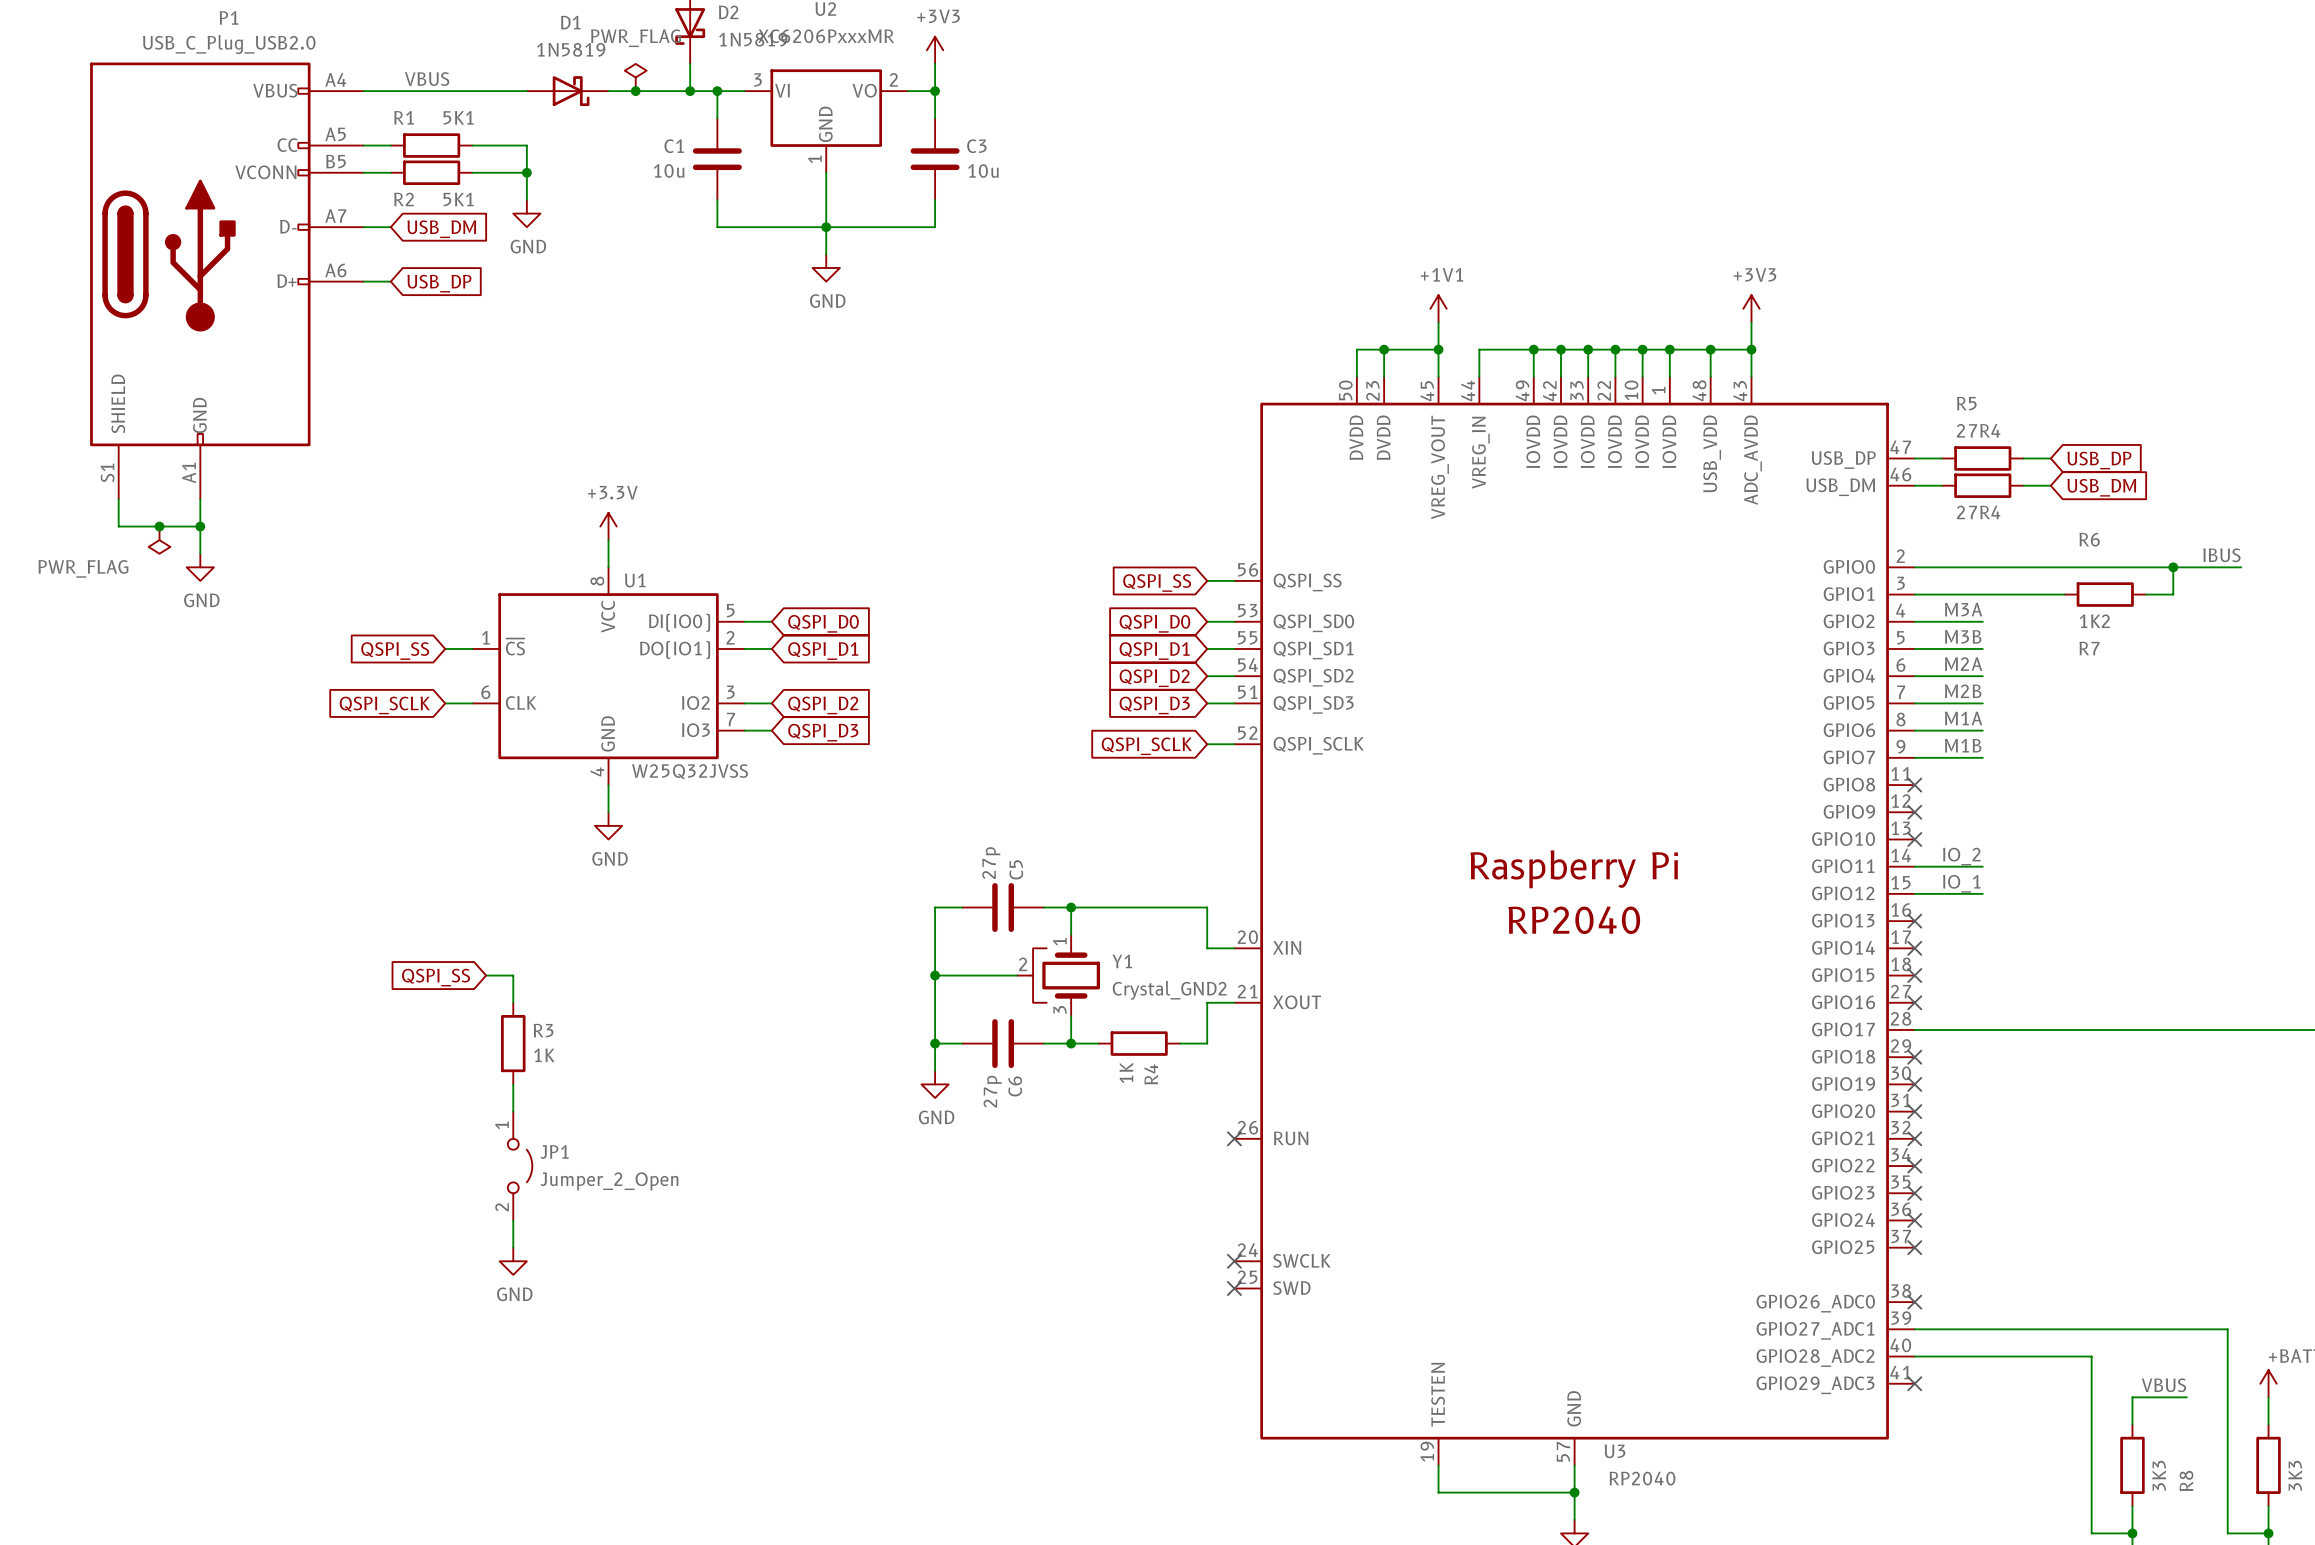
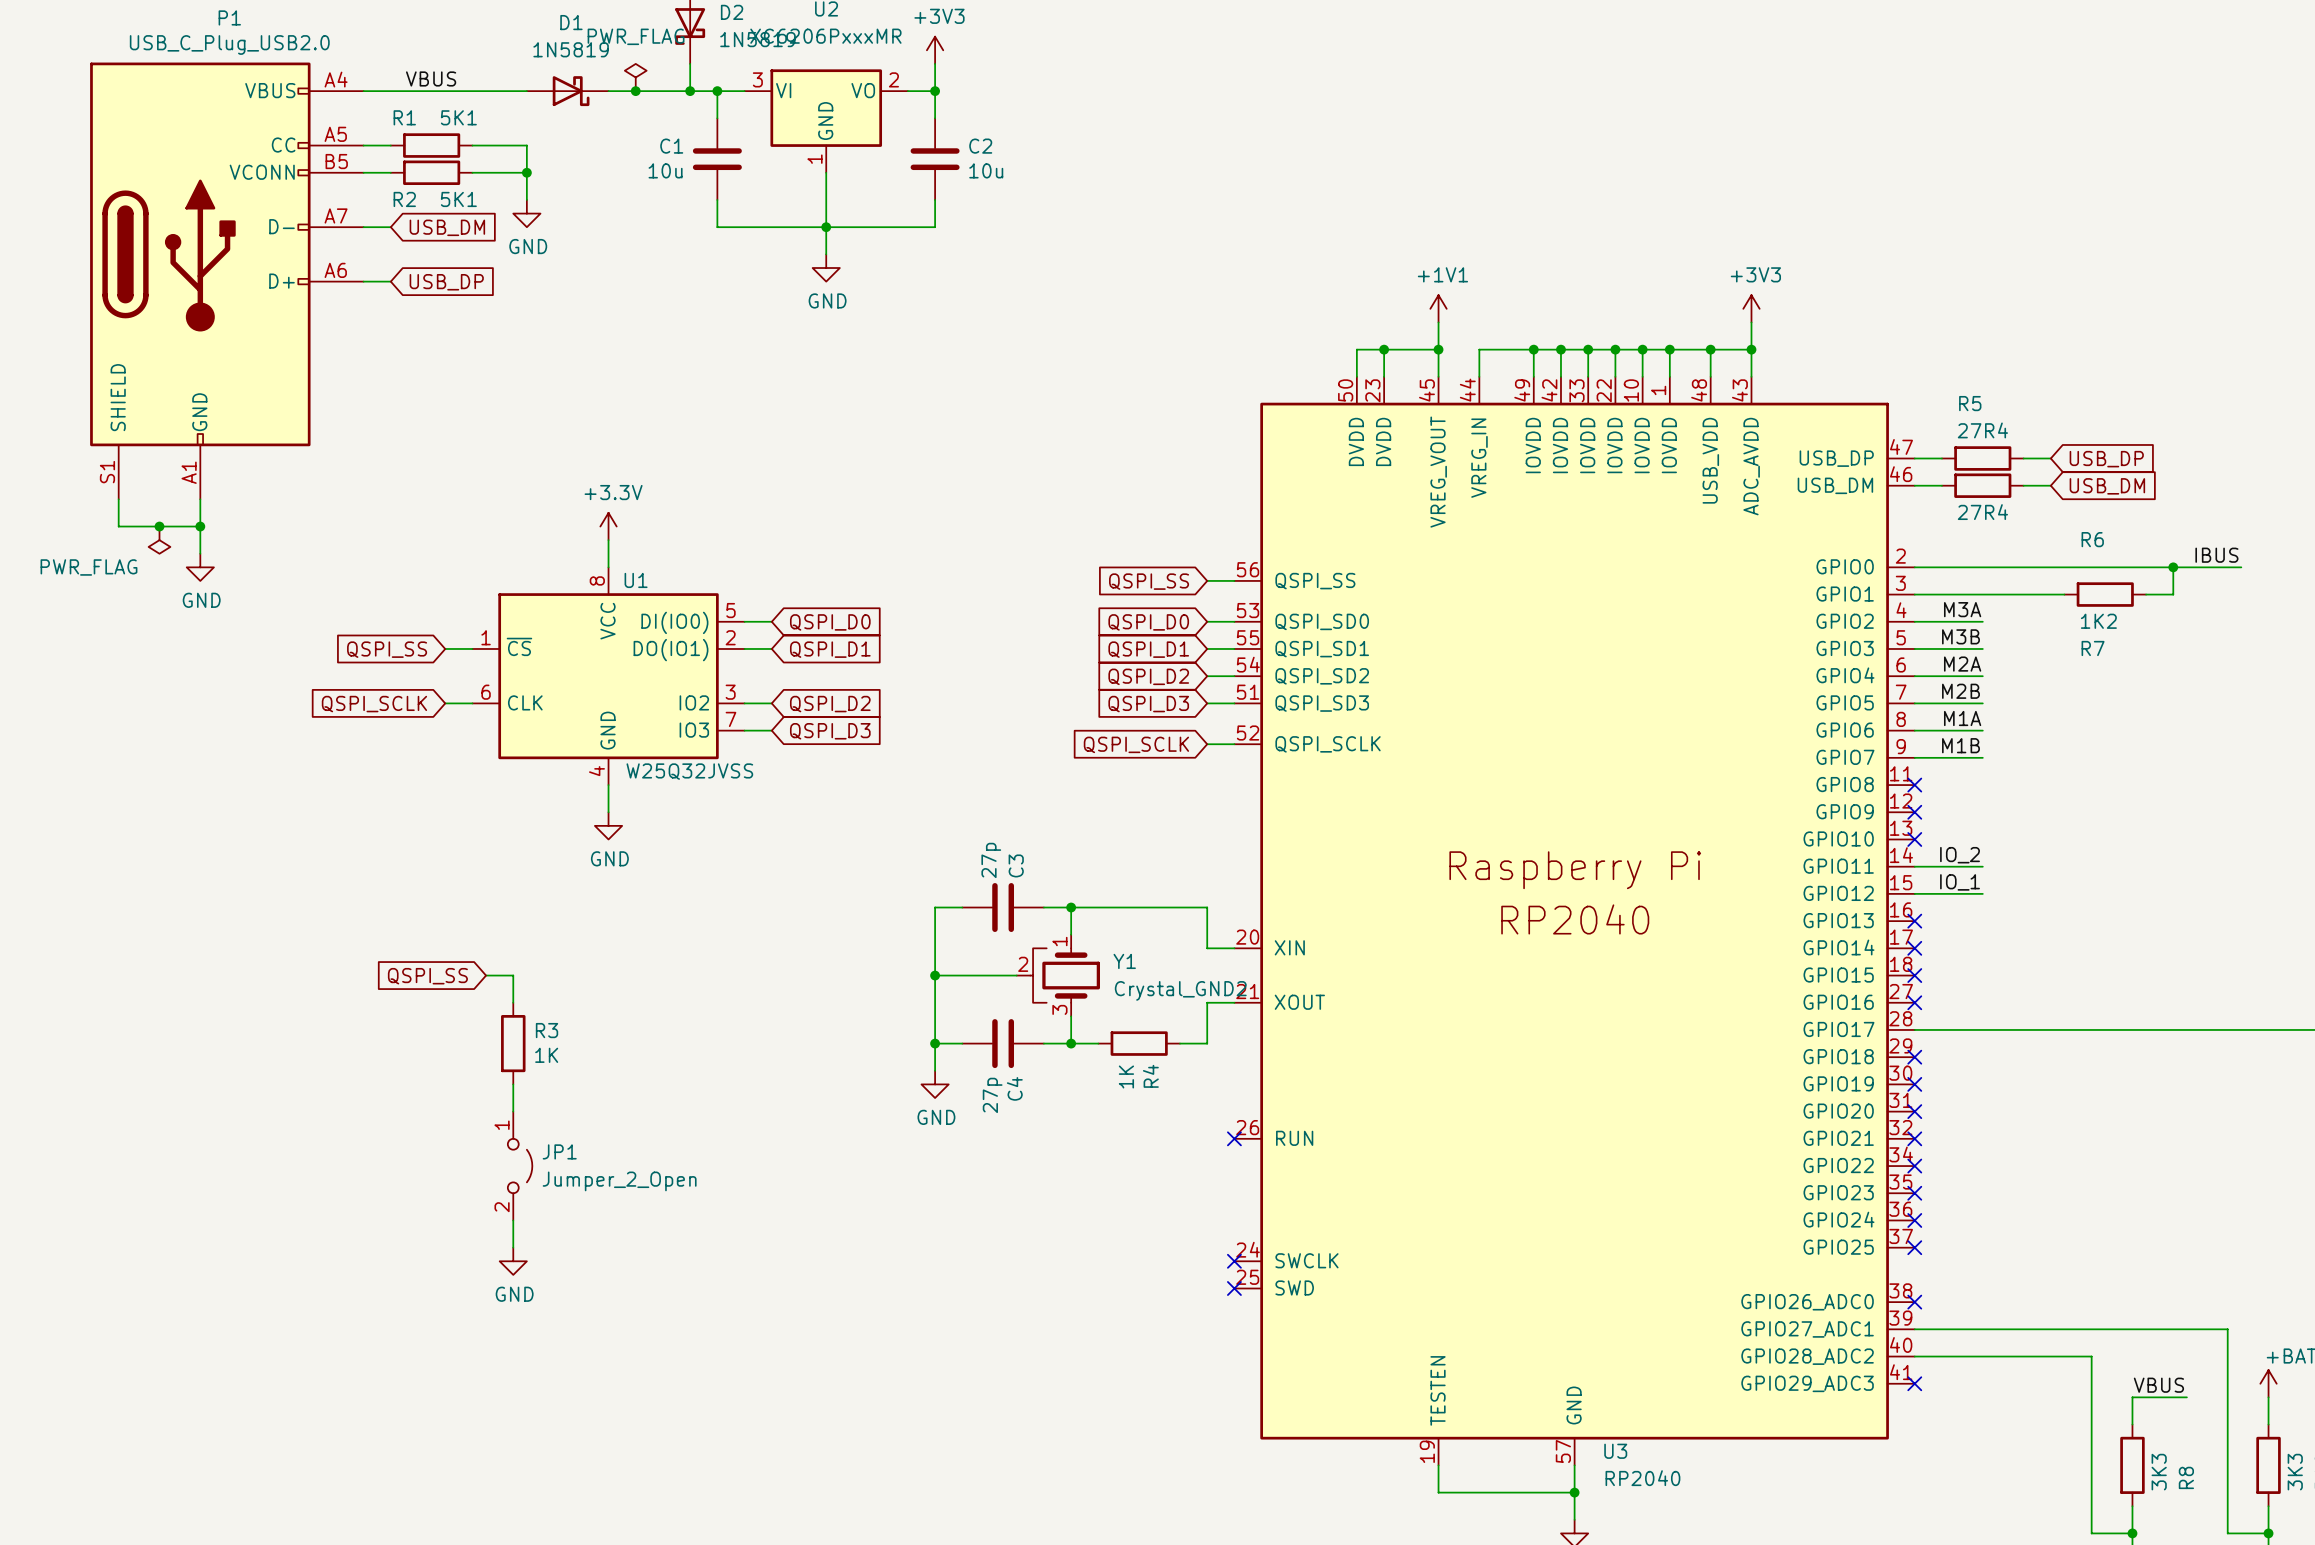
C3 name: C3 (976, 146) -> C2 (980, 146)
C5 name: C5 (1016, 869) -> C3 (1016, 865)
C6 name: C6 (1015, 1086) -> C4 (1014, 1088)

